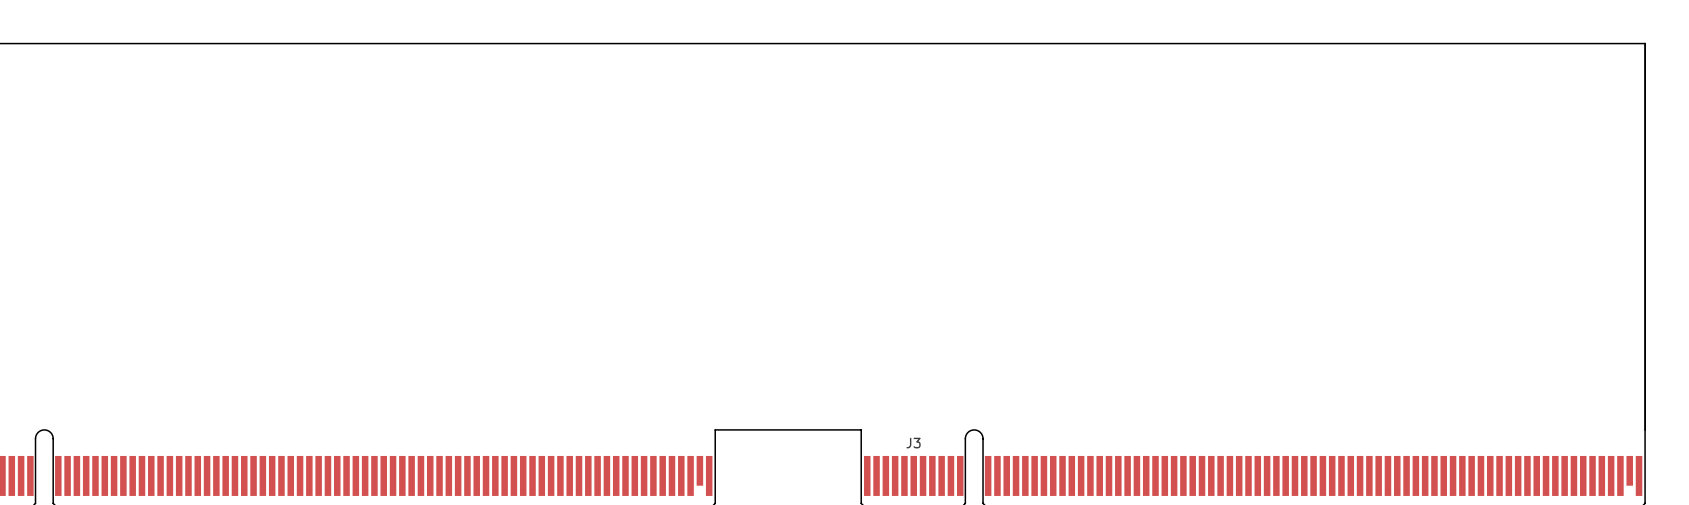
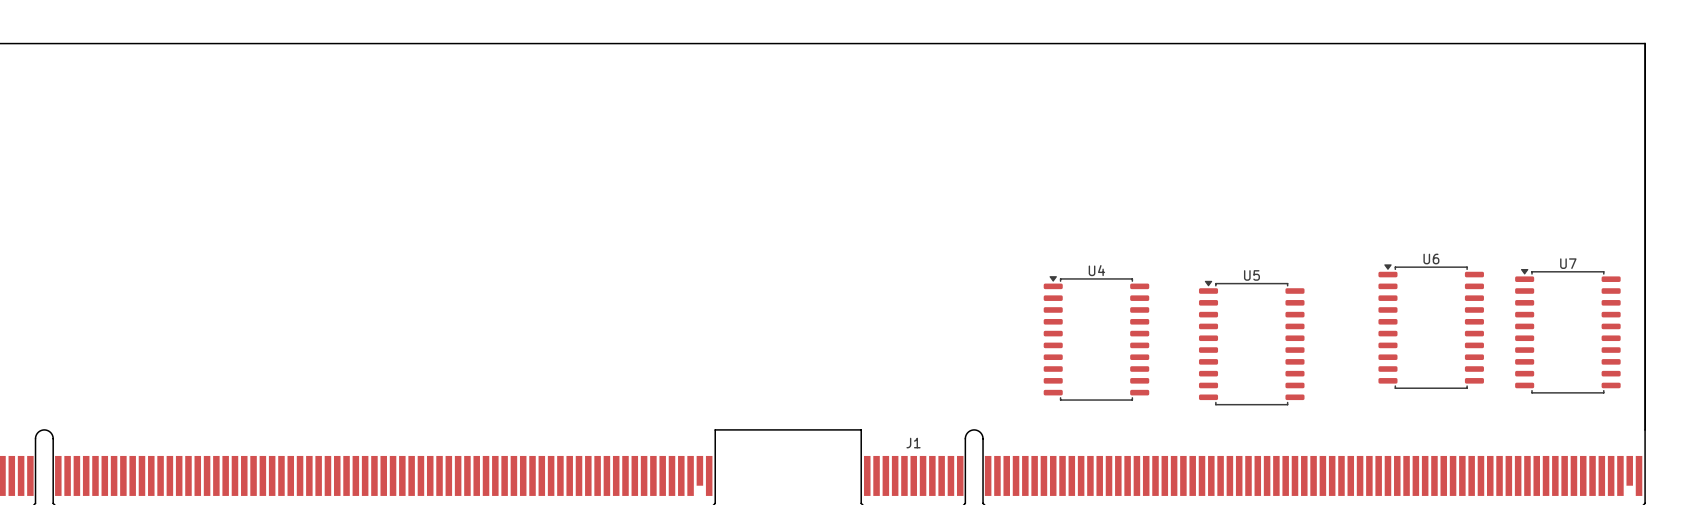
U6: none -> (1431, 326)
U7: none -> (1567, 331)
U4: none -> (1096, 338)
U5: none -> (1251, 343)
J3 name: J3 (913, 443) -> J1 (913, 443)

